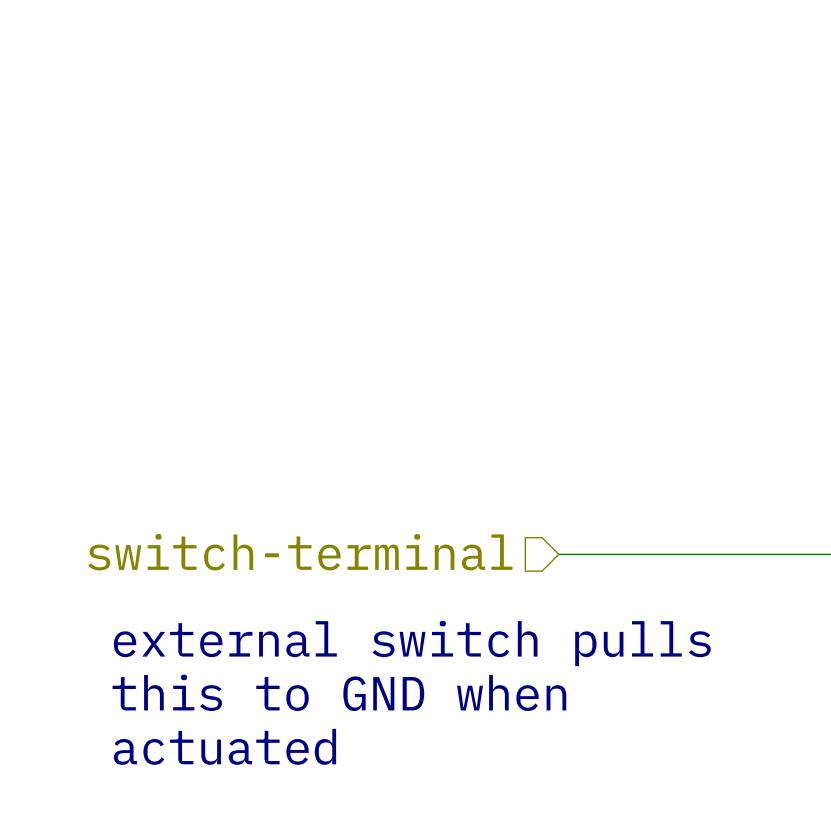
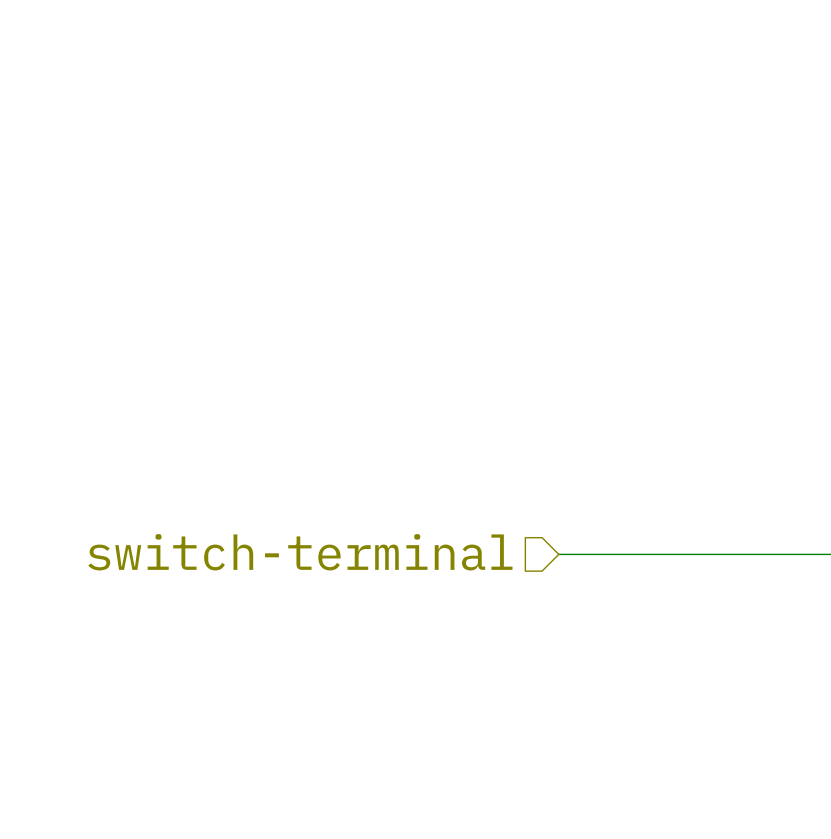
text: external switch pulls (412, 643) -> none
text: this to GND when (339, 692) -> none
text: actuated (224, 746) -> none

